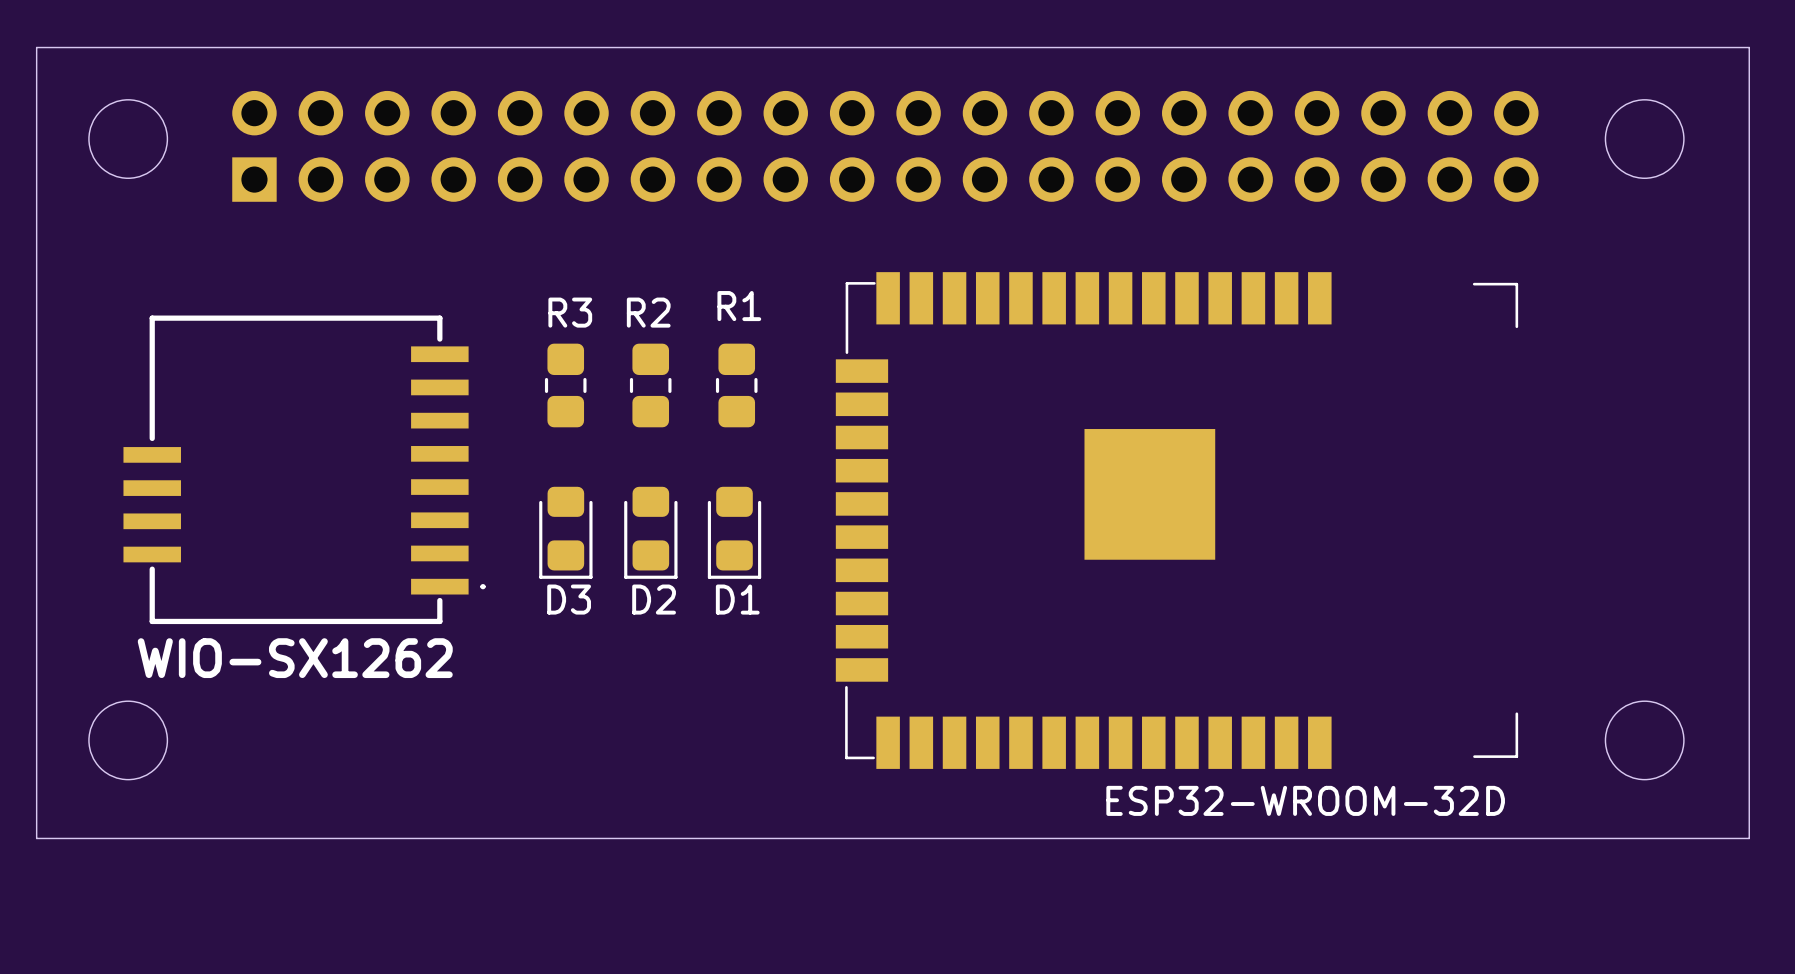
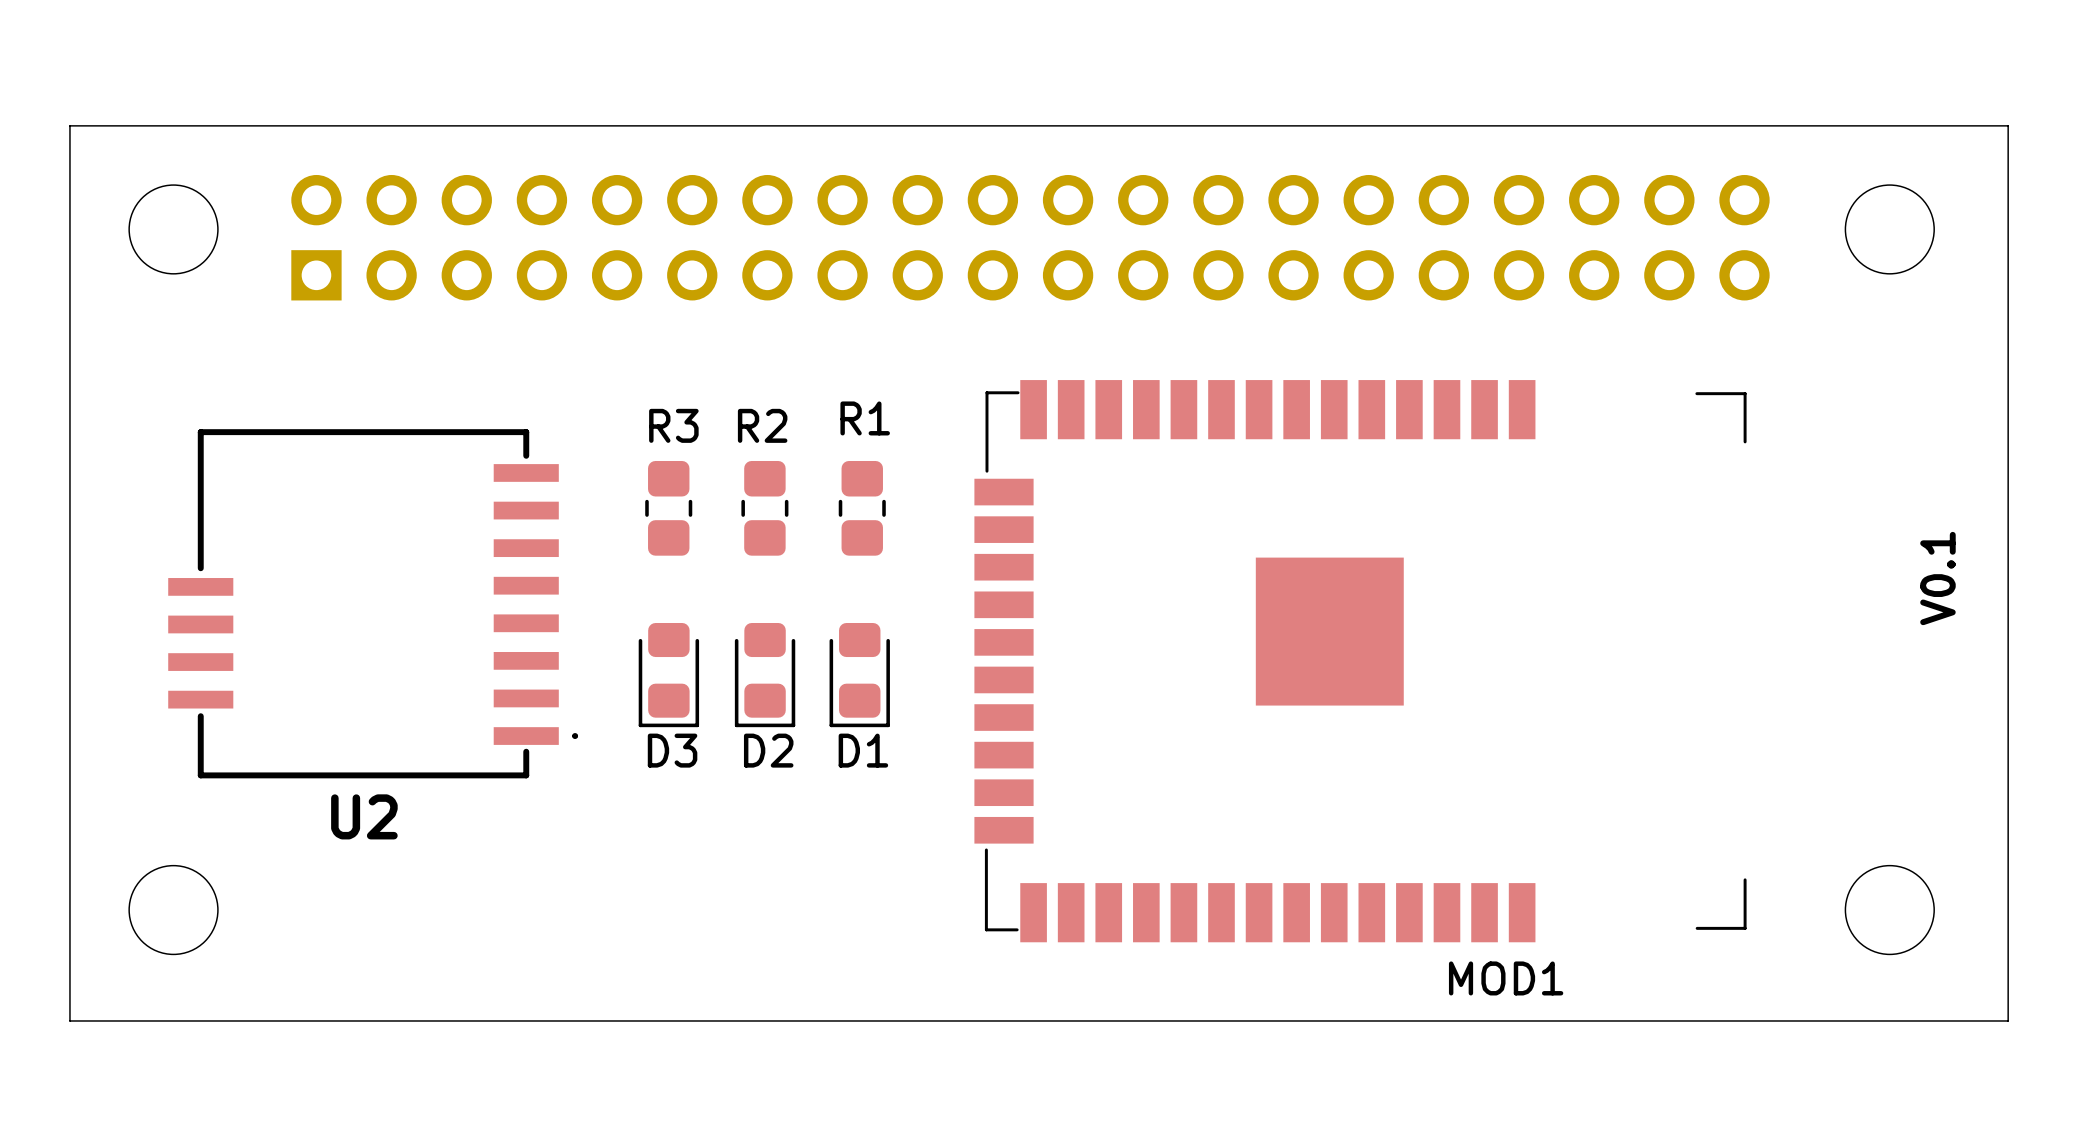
text: none -> V0.1 (1937, 578)
WIO-SX1262 name: WIO-SX1262 (295, 658) -> U2 (364, 816)
ESP32-WROOM-32D name: ESP32-WROOM-32D (1305, 800) -> MOD1 (1506, 978)

